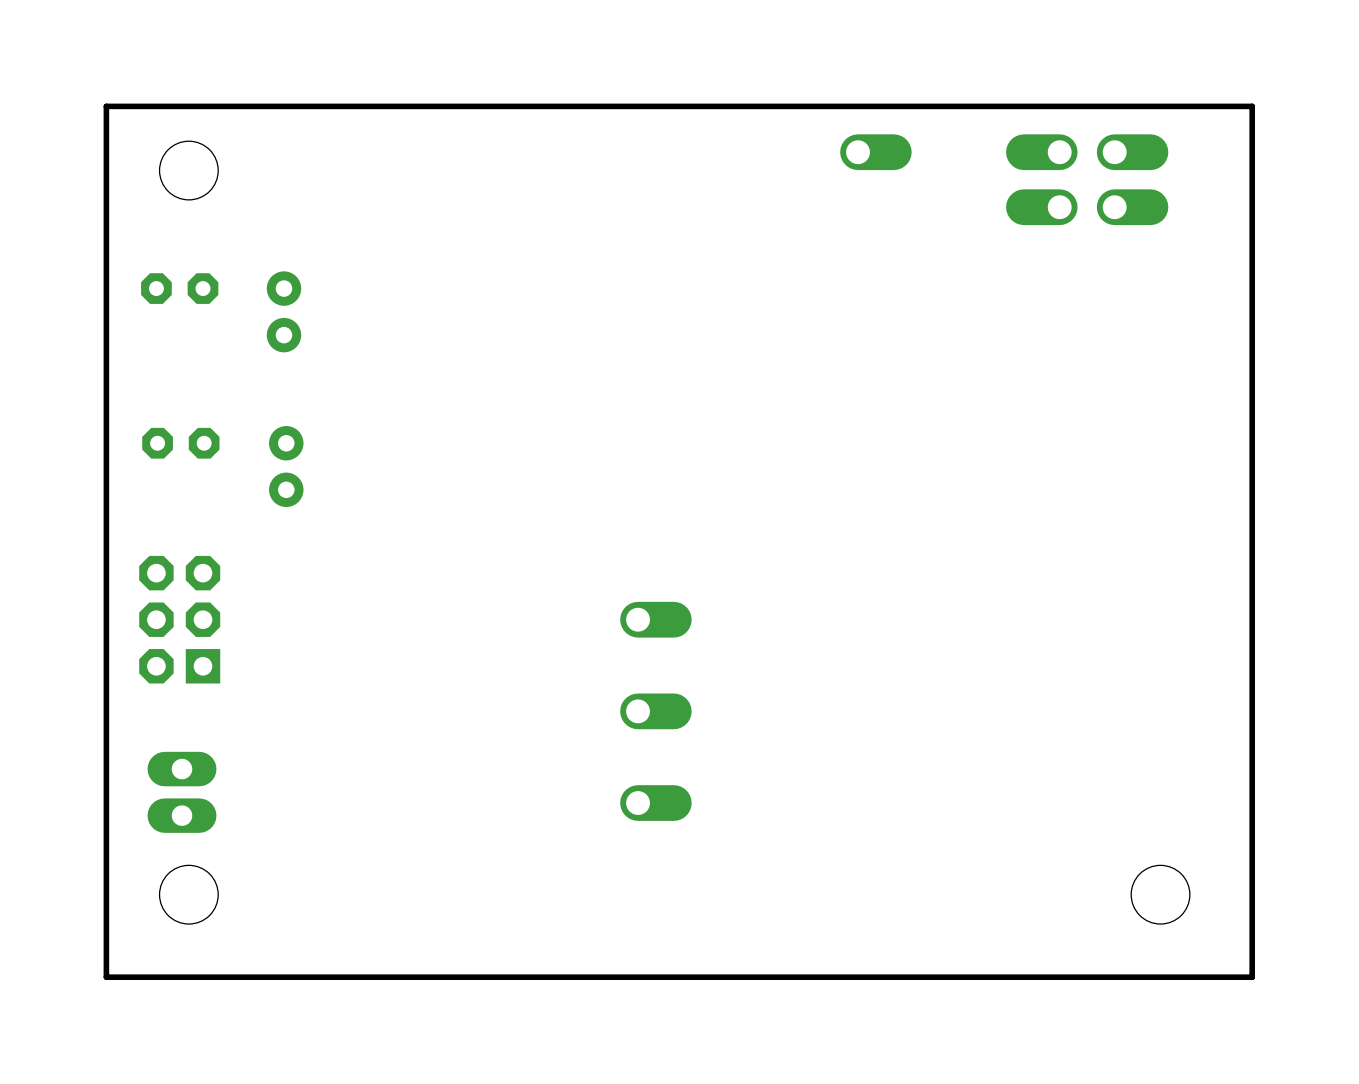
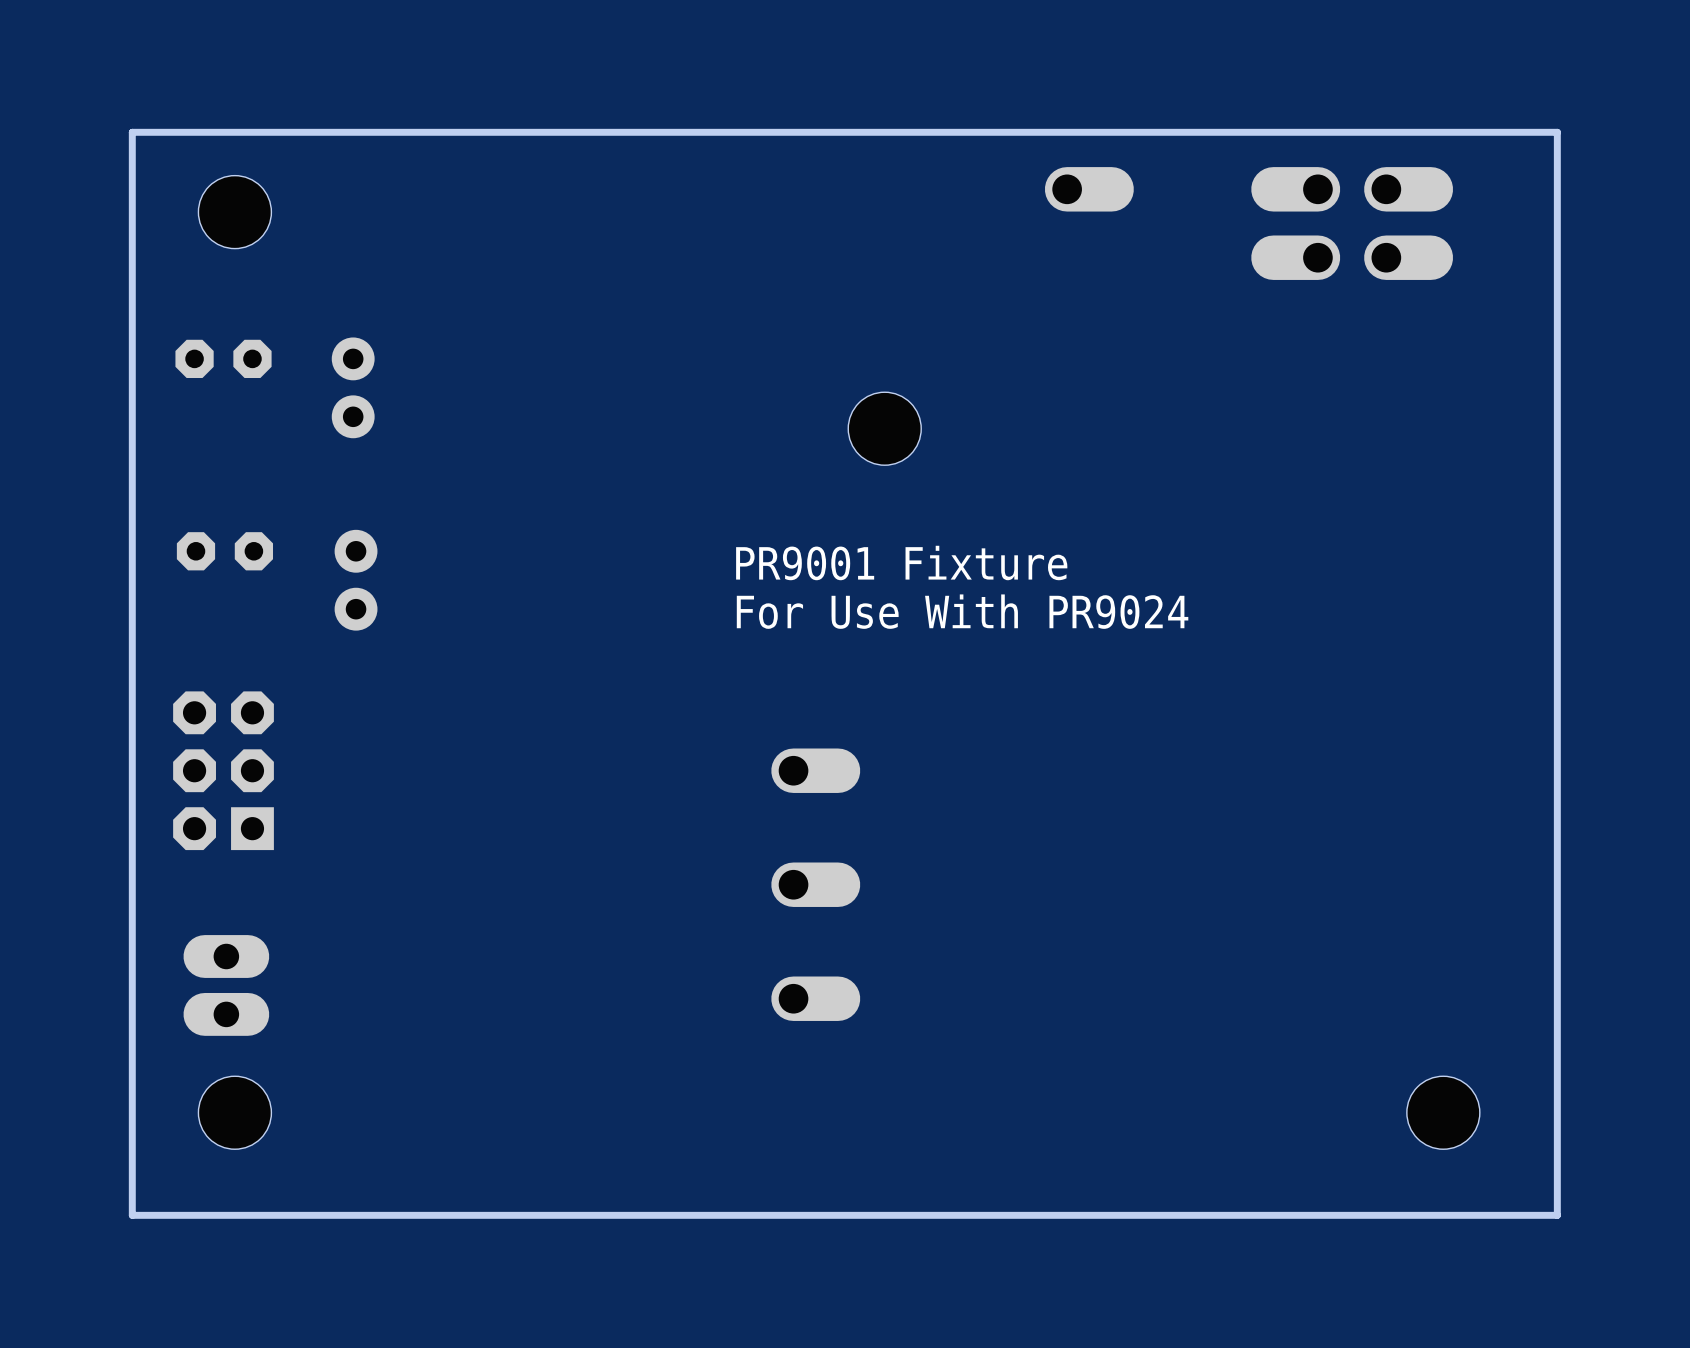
hole: none -> (884, 428)
text: none -> PR9001 Fixture (901, 562)
text: none -> For Use With PR9024 (962, 611)

